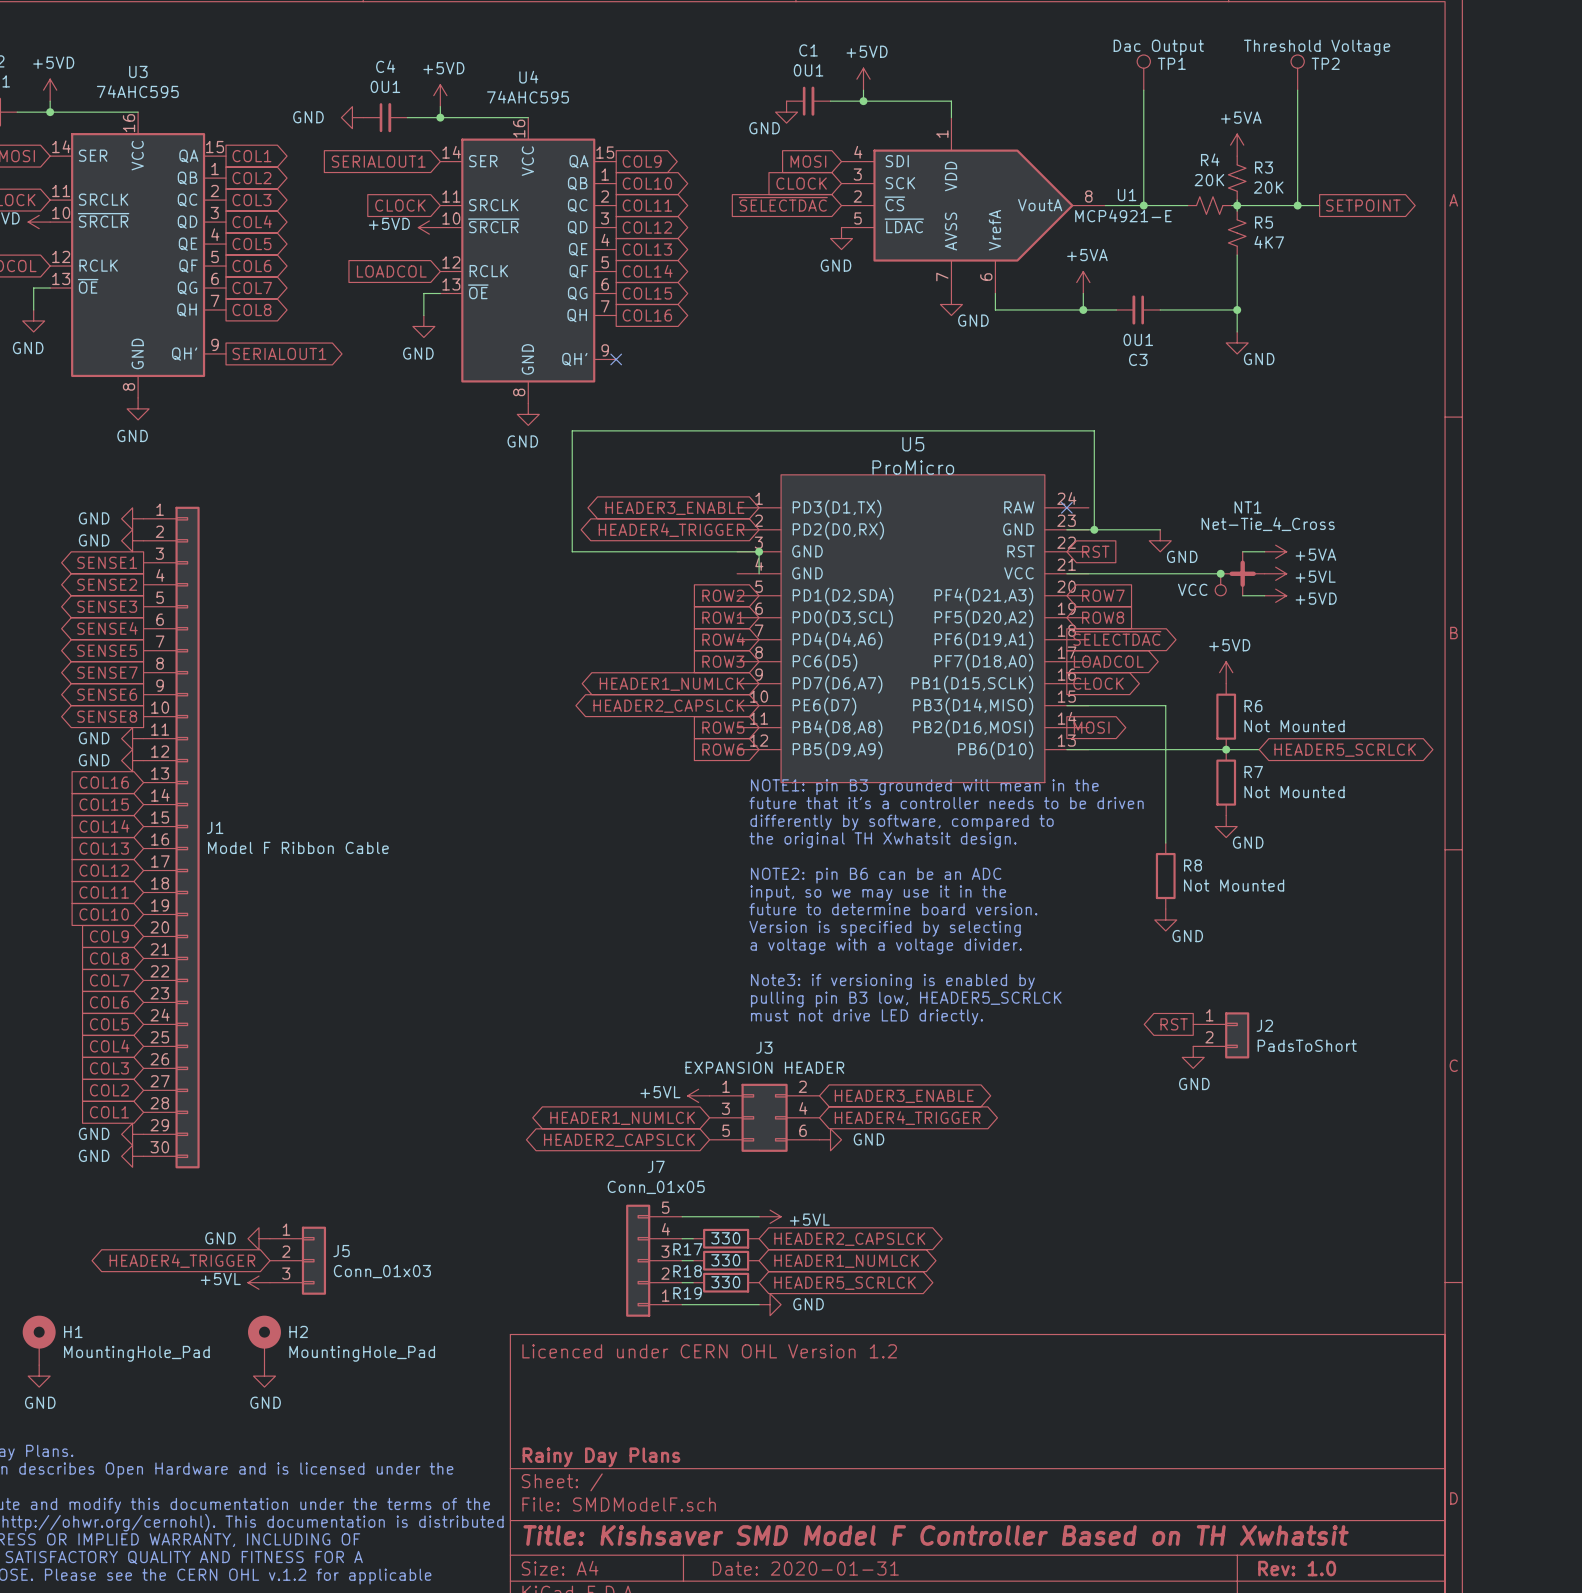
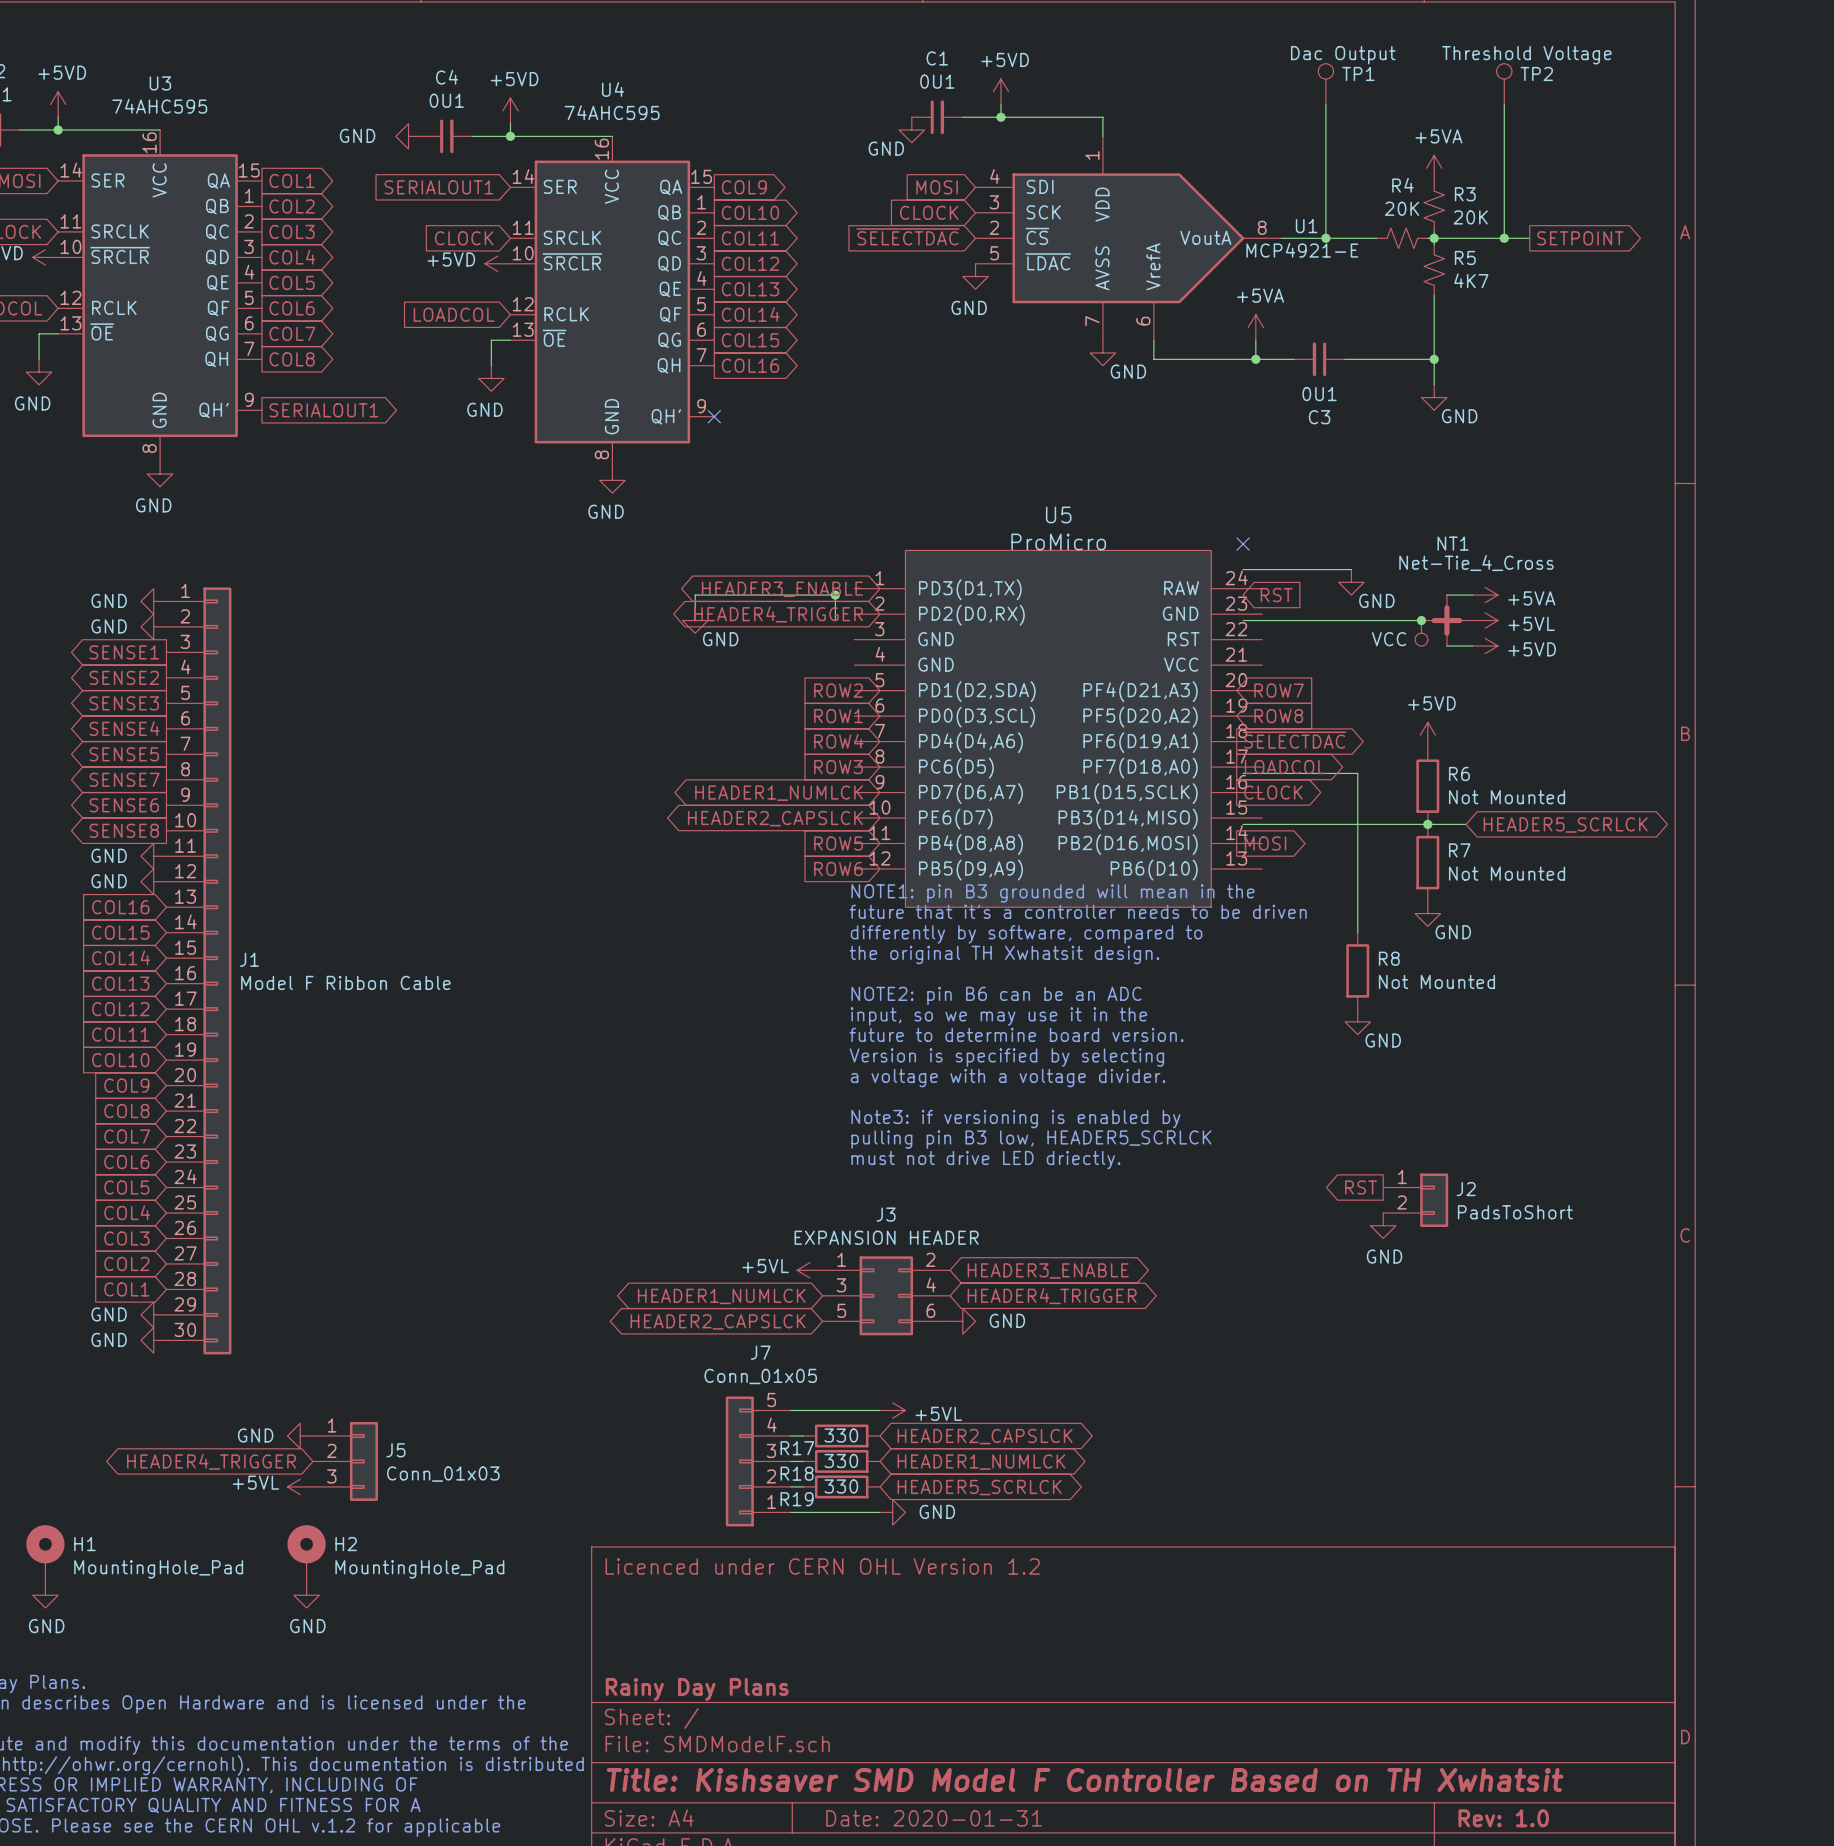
no-connect mark position: (1066, 507) -> (1243, 544)
junction: none -> (835, 595)
power symbol: none -> +5VA (1485, 595)
wire: none -> (695, 607) (695, 595) (835, 595) (835, 620)
wire: (1066, 529) (1160, 529) -> (1243, 569) (1351, 569)
wire: (1094, 529) (1094, 430) (572, 430) (572, 551) (759, 551) (759, 573) -> none
junction: (1094, 529) -> none
power symbol: none -> GND (695, 620)
power symbol position: GND (1160, 540) -> GND (1351, 582)
junction: (759, 551) -> none
global label position: RST (1095, 551) -> RST (1276, 595)
wire: (1242, 551) (1264, 551) -> (1446, 595) (1472, 595)
power symbol: +5VA (1275, 551) -> +5VD (1485, 646)
wire: (1066, 573) (1220, 573) -> (1243, 620) (1421, 620)
junction position: (1220, 573) -> (1421, 620)
NT1 position: (1242, 573) -> (1446, 620)
power symbol position: +5VL (1275, 573) -> +5VL (1485, 620)
power symbol position: VCC (1220, 584) -> VCC (1421, 633)
wire: (1242, 595) (1264, 595) -> (1446, 646) (1472, 646)
power symbol: +5VD (1275, 595) -> none
power symbol: none -> +5VD (1427, 735)
power symbol: +5VD (1226, 672) -> none
wire: (1066, 705) (1165, 705) (1165, 843) -> (1243, 773) (1357, 773) (1357, 932)
R6 position: (1226, 716) -> (1427, 786)
wire: (1066, 749) (1259, 749) -> (1243, 824) (1466, 824)
junction position: (1226, 749) -> (1427, 824)
global label position: HEADER5_SCRLCK (1345, 750) -> HEADER5_SCRLCK (1565, 825)
R7 position: (1226, 782) -> (1427, 862)
text position: NOTE1: pin B3 grounded will mean in the (924, 787) -> NOTE1: pin B3 grounded will mean in the (1052, 893)
power symbol: none -> GND (1427, 913)
text position: future that it's a controller needs to be driven (946, 803) -> future that it's a controller needs to be driven (1078, 911)
text position: differently by software, compared to (902, 822) -> differently by software, compared to (1026, 934)
power symbol: GND (1226, 826) -> none
text position: the original TH Xwhatsit design. (882, 840) -> the original TH Xwhatsit design. (1004, 954)
text position: NOTE2: pin B6 can be an ADC (876, 875) -> NOTE2: pin B6 can be an ADC (996, 995)
R8 position: (1165, 876) -> (1357, 970)
power symbol: none -> GND (1357, 1021)
text position: input, so we may use it in the (878, 893) -> input, so we may use it in the (998, 1016)
text position: future to determine board version. (893, 909) -> future to determine board version. (1016, 1034)
power symbol: GND (1165, 919) -> none
text position: Version is specified by selecting (885, 928) -> Version is specified by selecting (1006, 1057)
text position: a voltage with a voltage divider. (886, 946) -> a voltage with a voltage divider. (1008, 1078)
text position: Note3: if versioning is enabled by (892, 981) -> Note3: if versioning is enabled by (1015, 1119)
text position: pulling pin B3 low, HEADER5_SCRLCK (906, 999) -> pulling pin B3 low, HEADER5_SCRLCK (1031, 1139)
text position: must not drive LED driectly. (866, 1017) -> must not drive LED driectly. (985, 1160)

